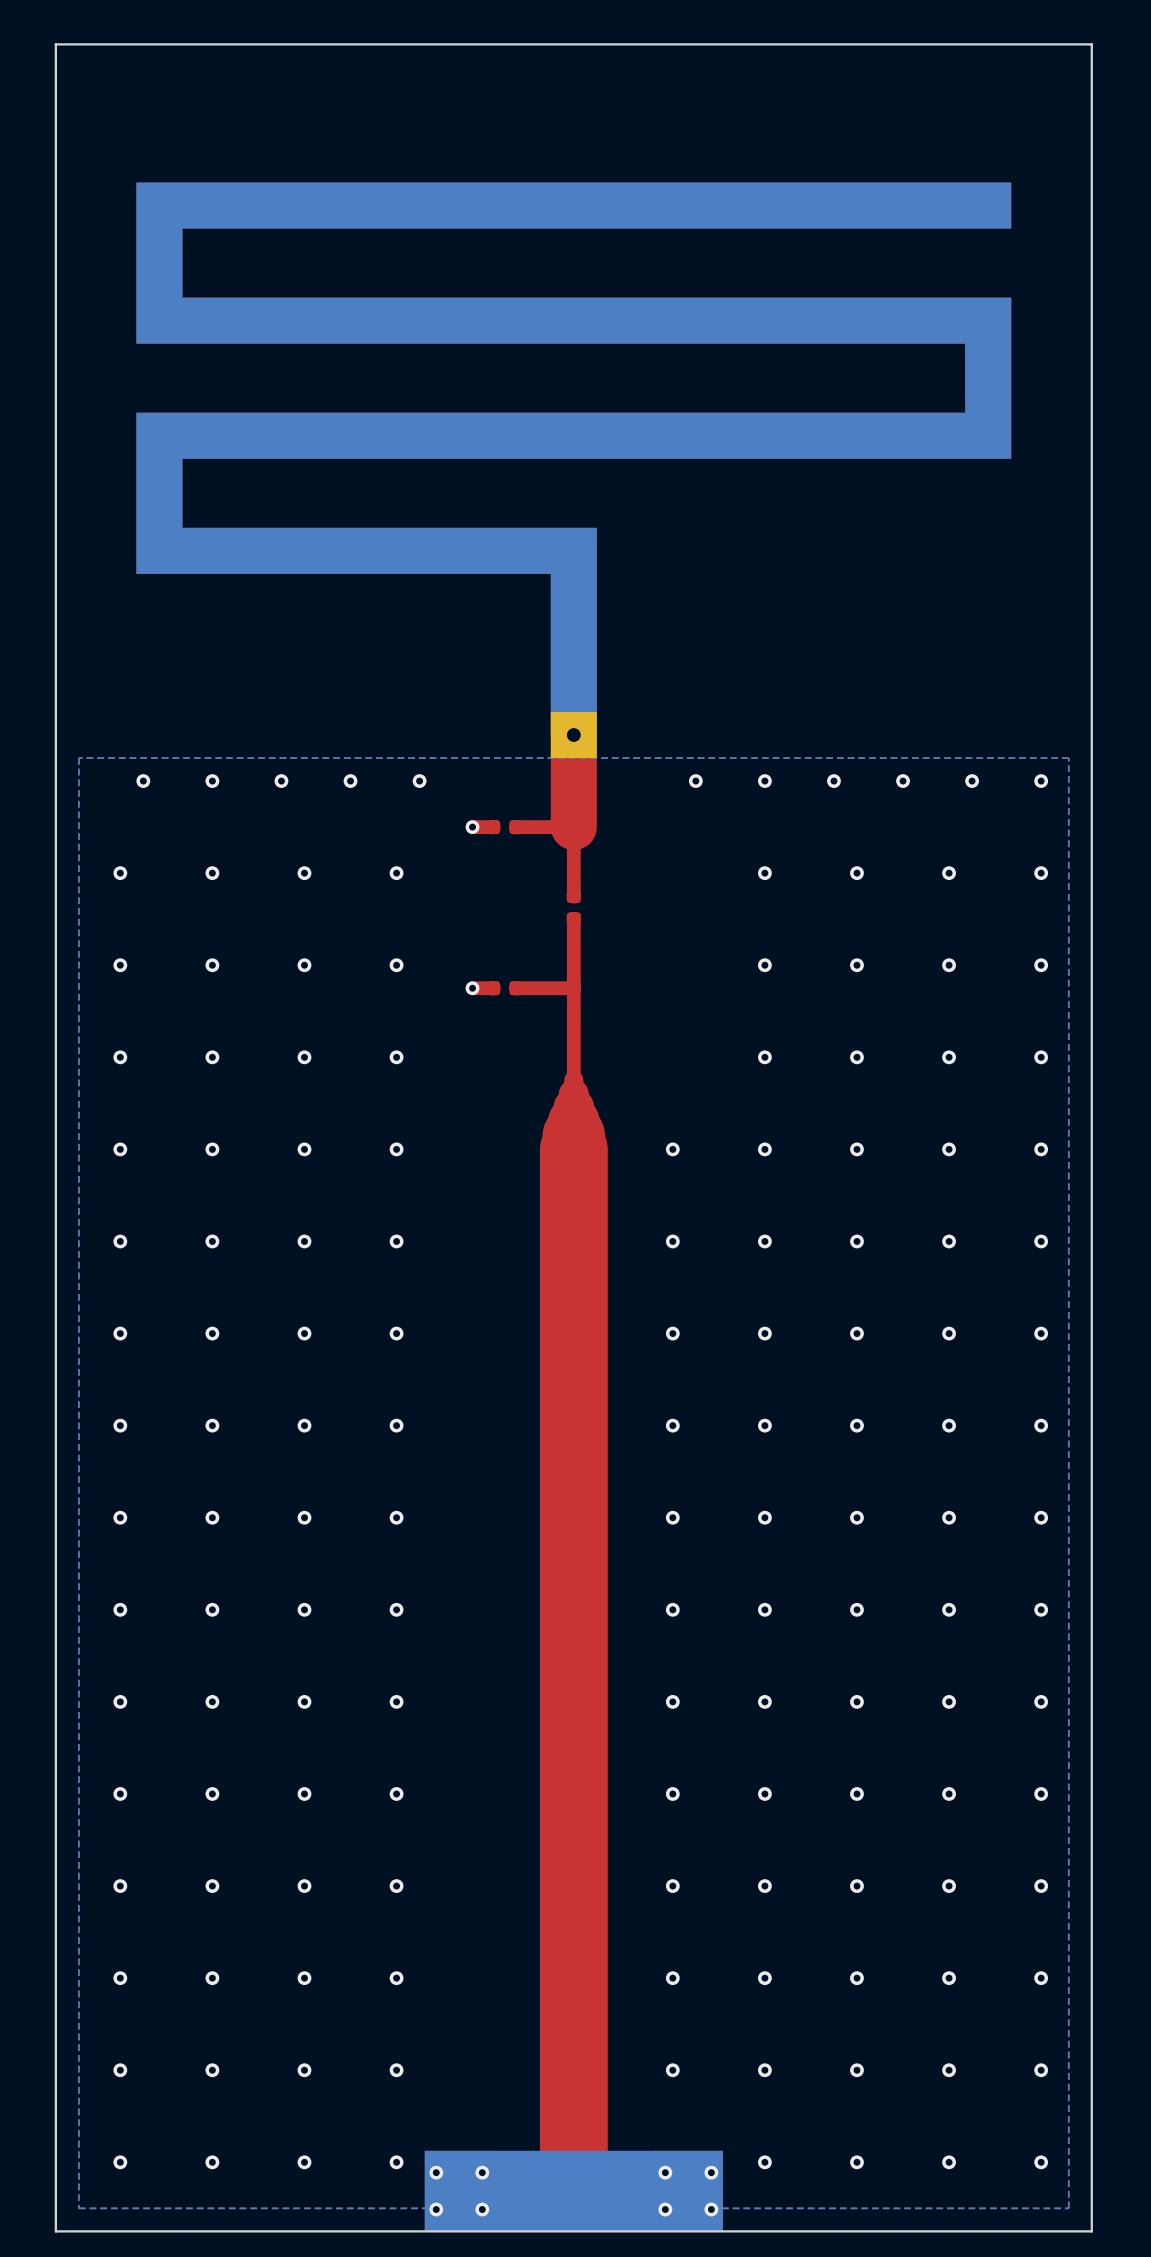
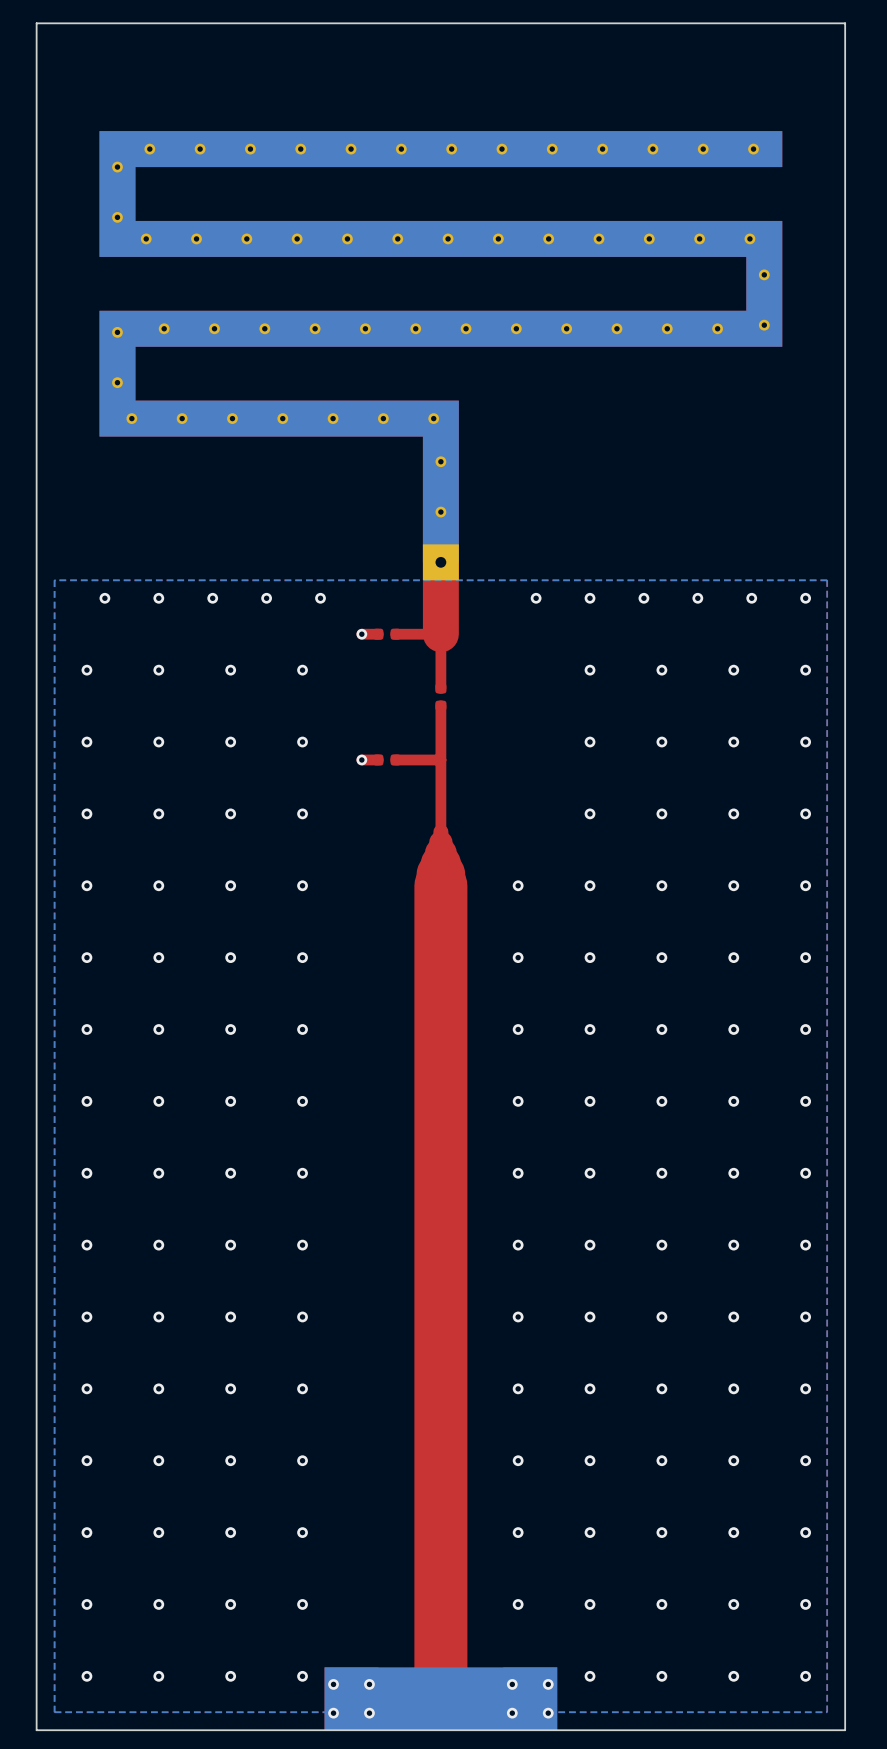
part footprint: [136, 182, 1012, 759] -> [99, 131, 783, 581]

